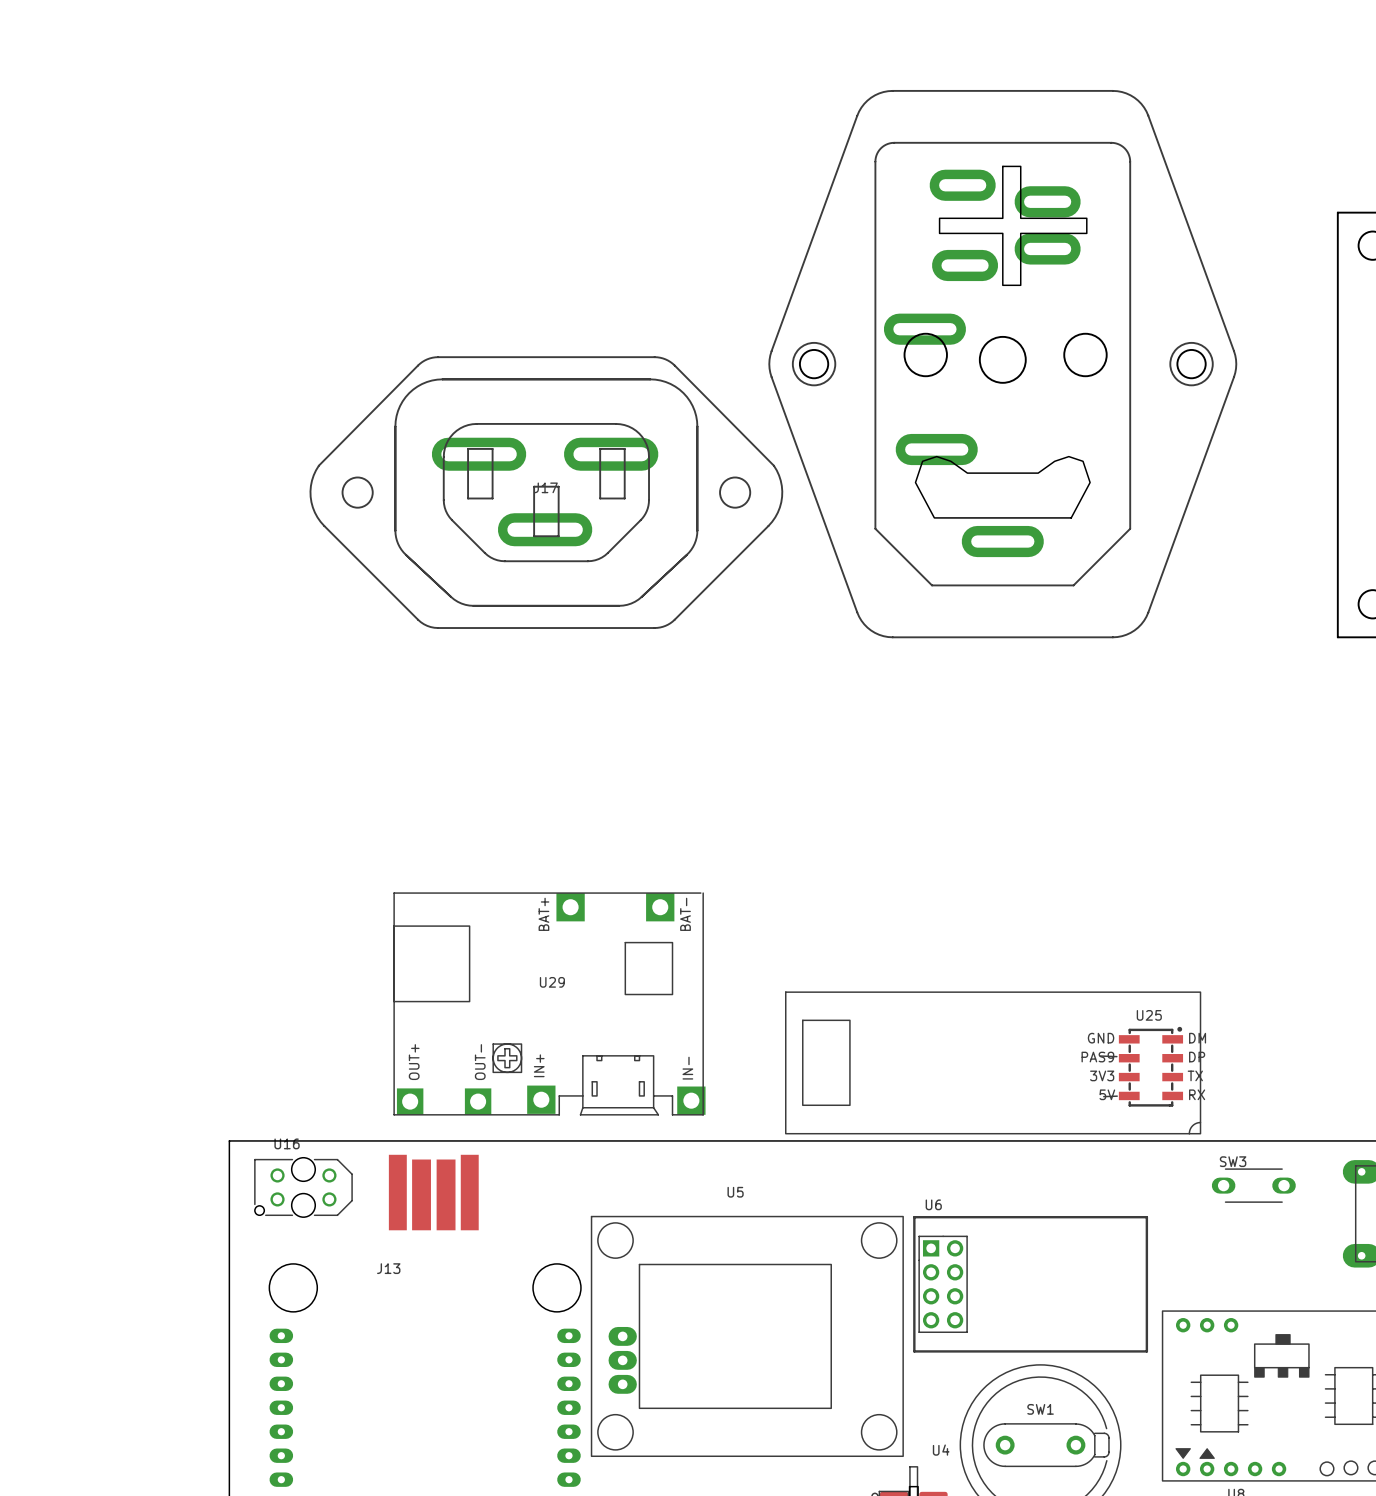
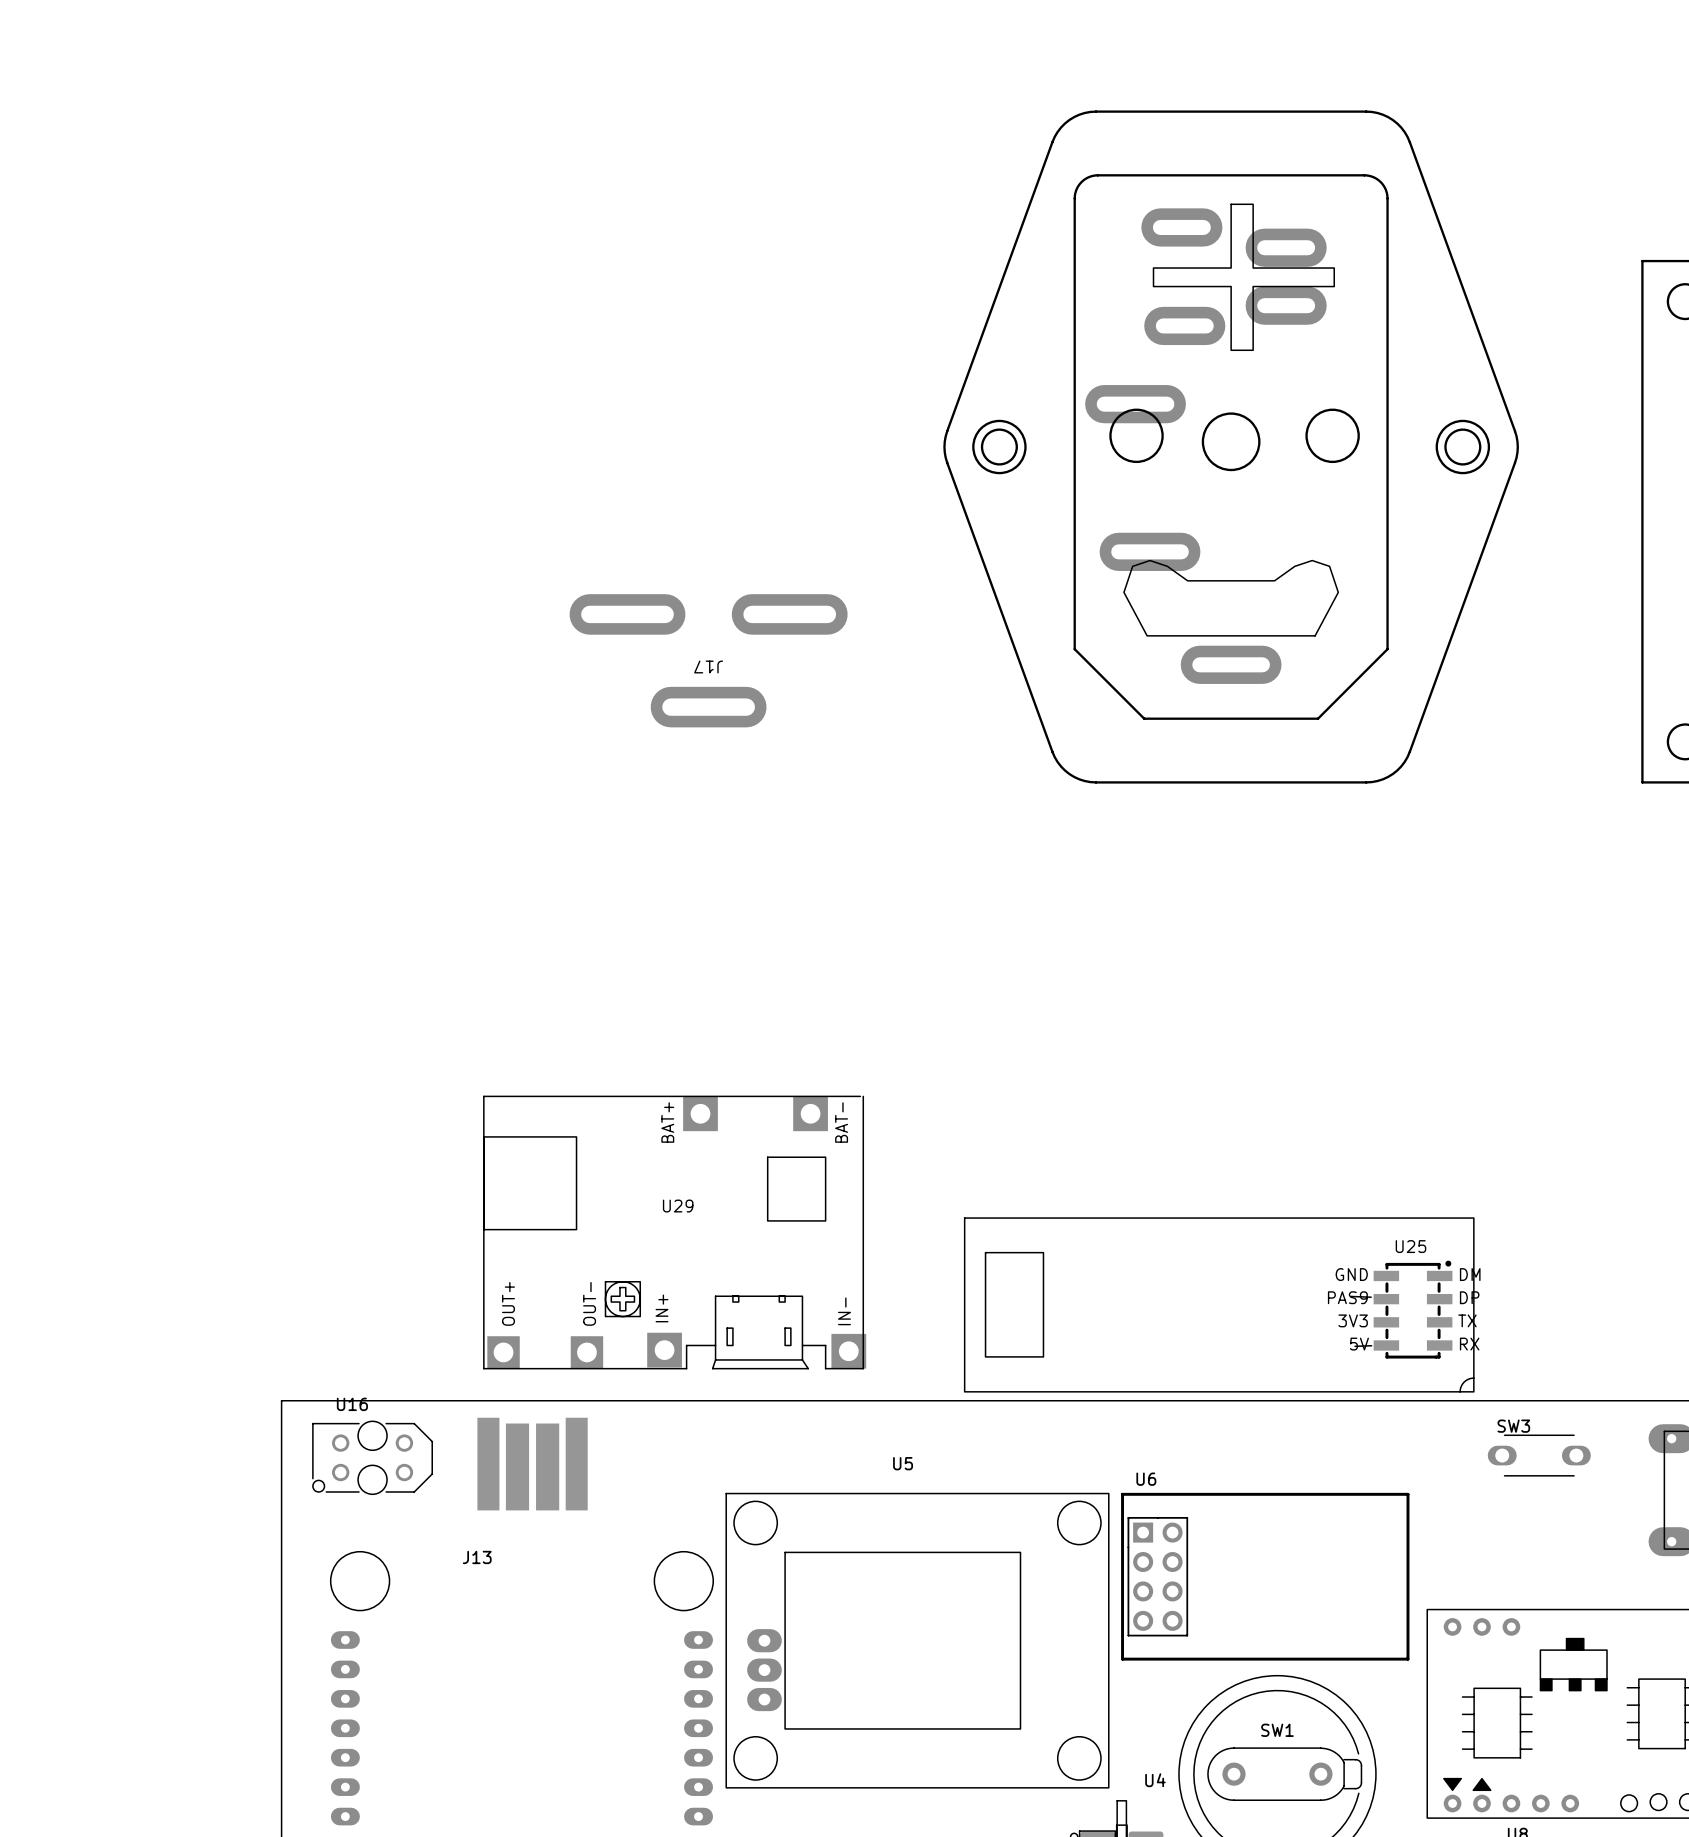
J17 footprint: [309, 356, 784, 629] -> [569, 594, 848, 728]

